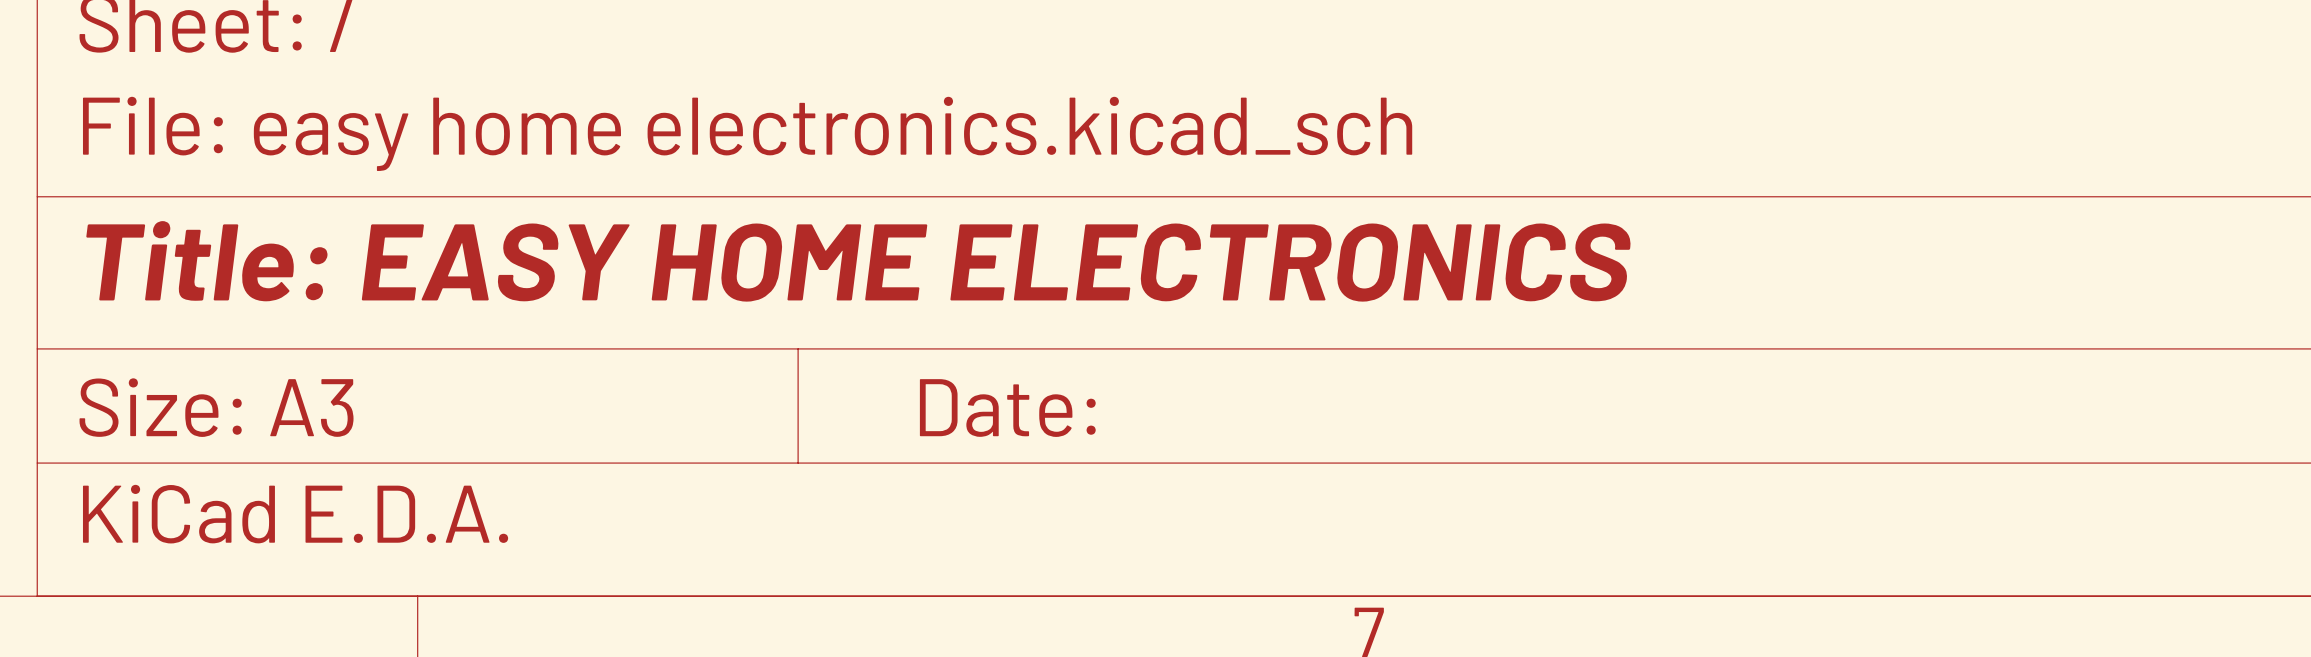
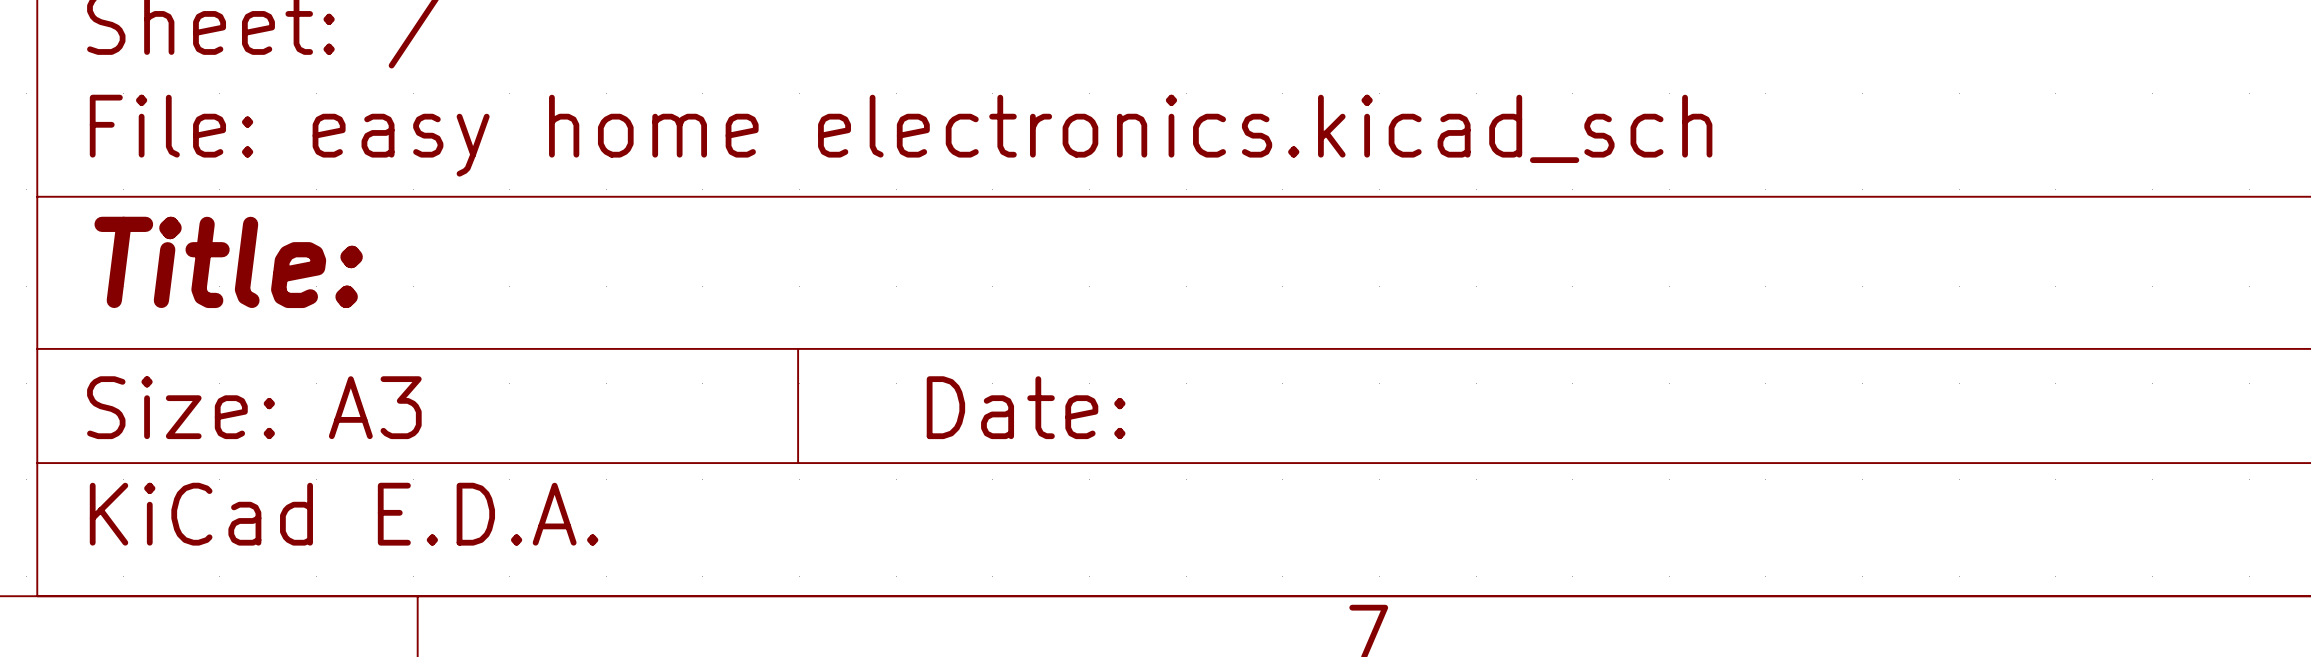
title block: Title: EASY HOME ELECTRONICS (858, 261) -> Title: (228, 262)

